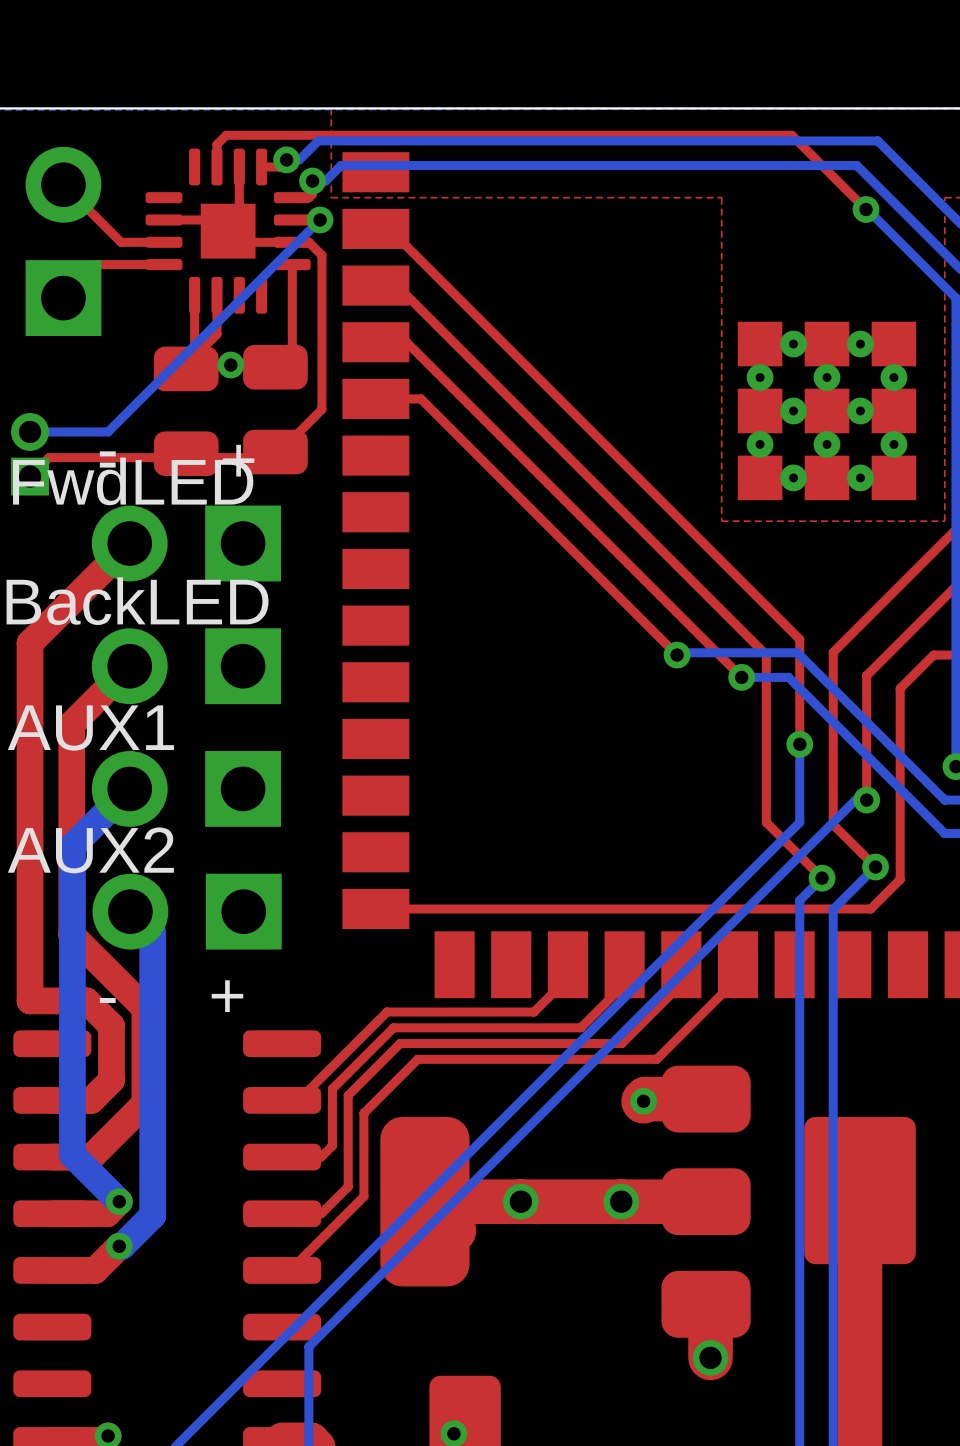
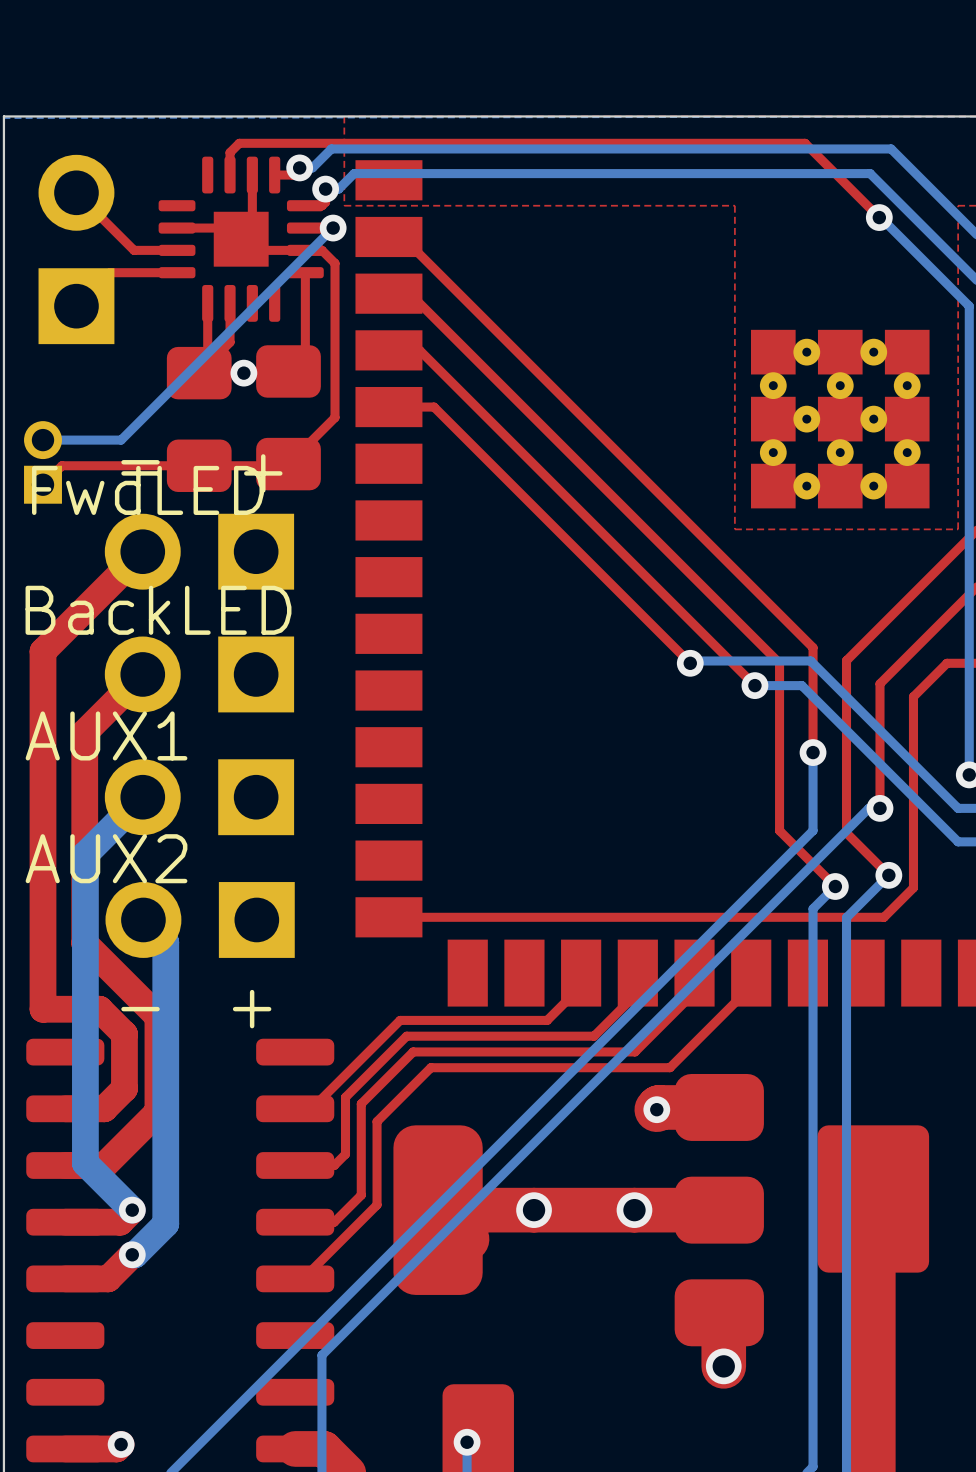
part footprint: [243, 344, 308, 475] -> [256, 345, 321, 491]
part footprint: [153, 346, 219, 477] -> [166, 346, 232, 492]

